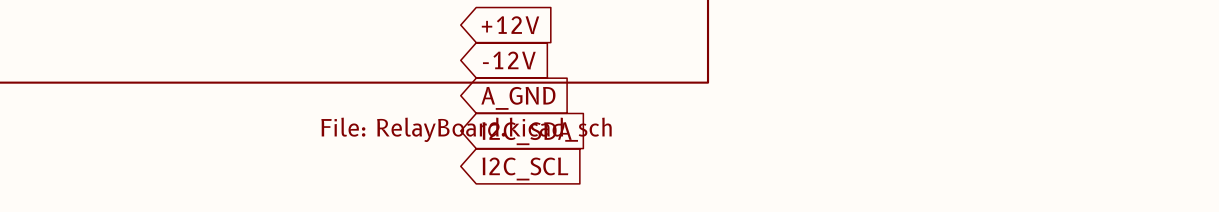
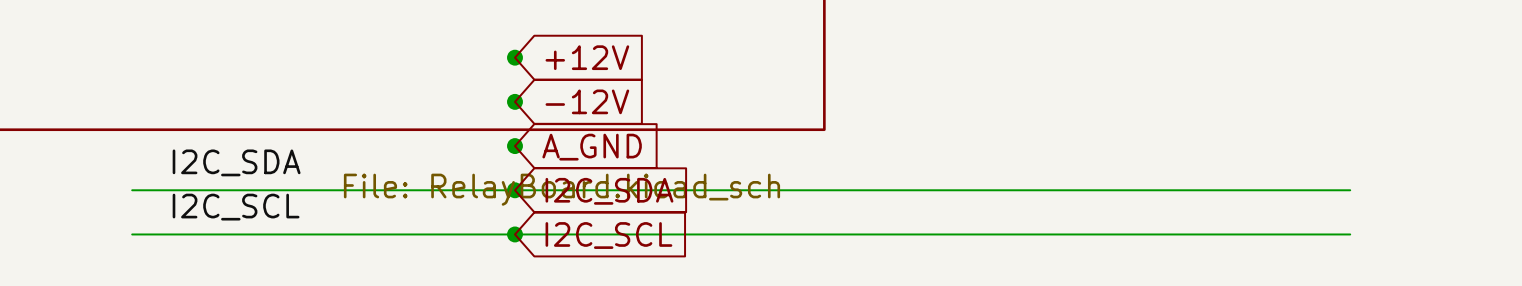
junction: none -> (514, 57)
junction: none -> (514, 101)
junction: none -> (514, 146)
label: none -> I2C_SDA (236, 162)
wire: none -> (132, 190) (1350, 190)
junction: none -> (514, 190)
label: none -> I2C_SCL (236, 207)
wire: none -> (132, 234) (1350, 234)
junction: none -> (514, 234)

